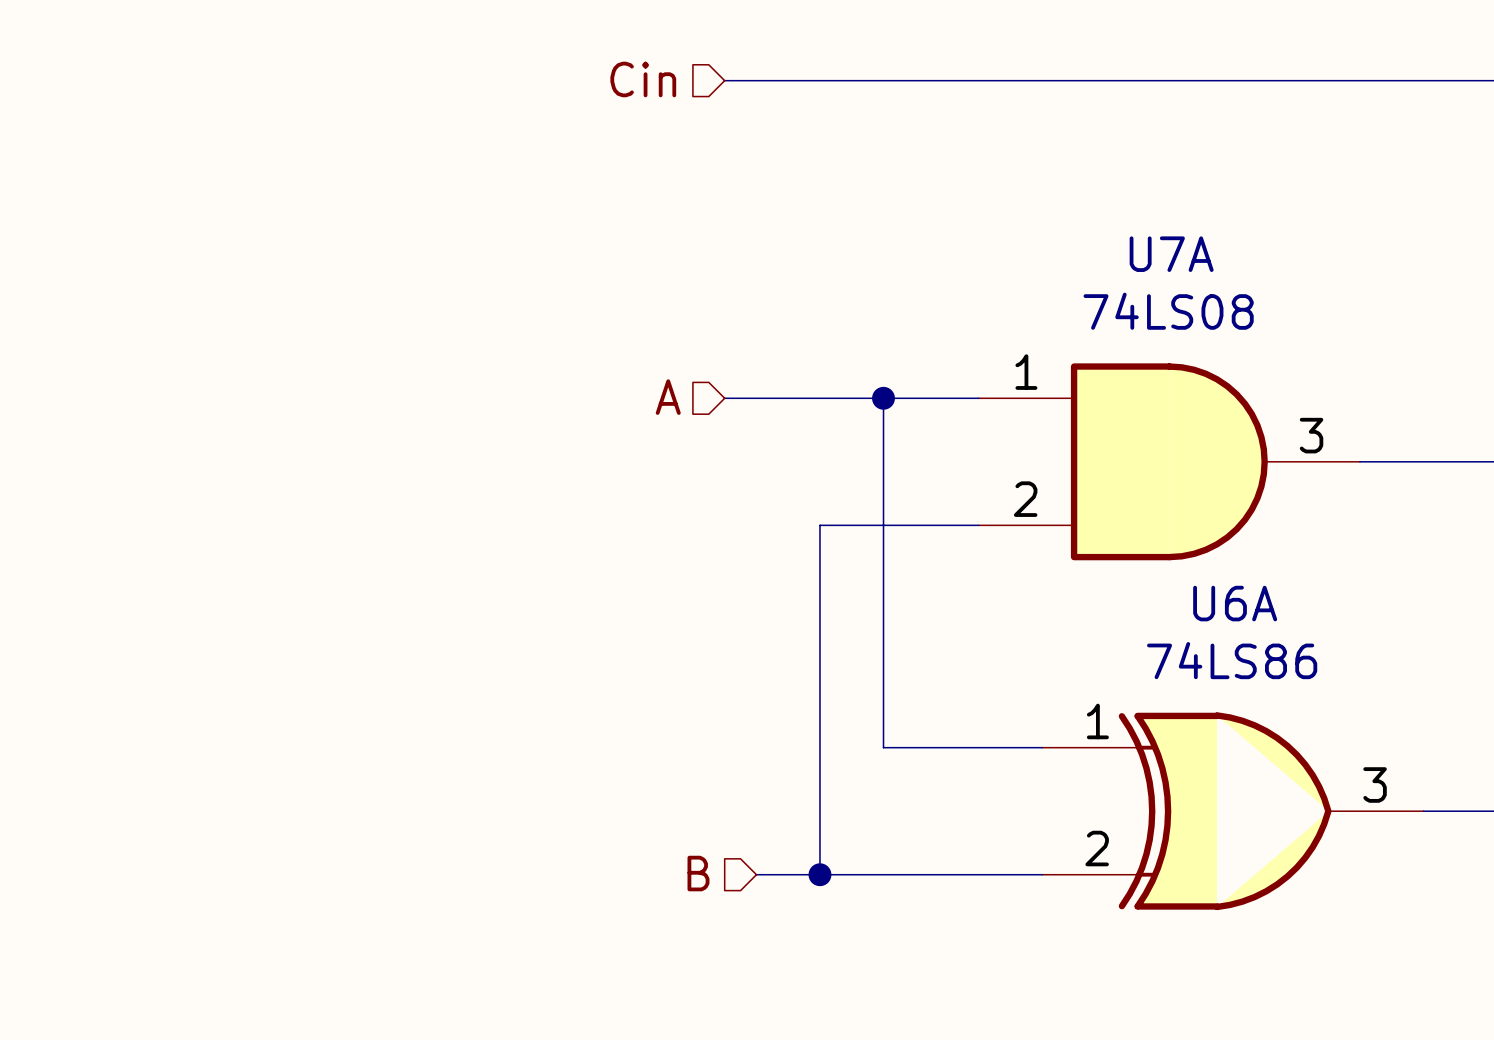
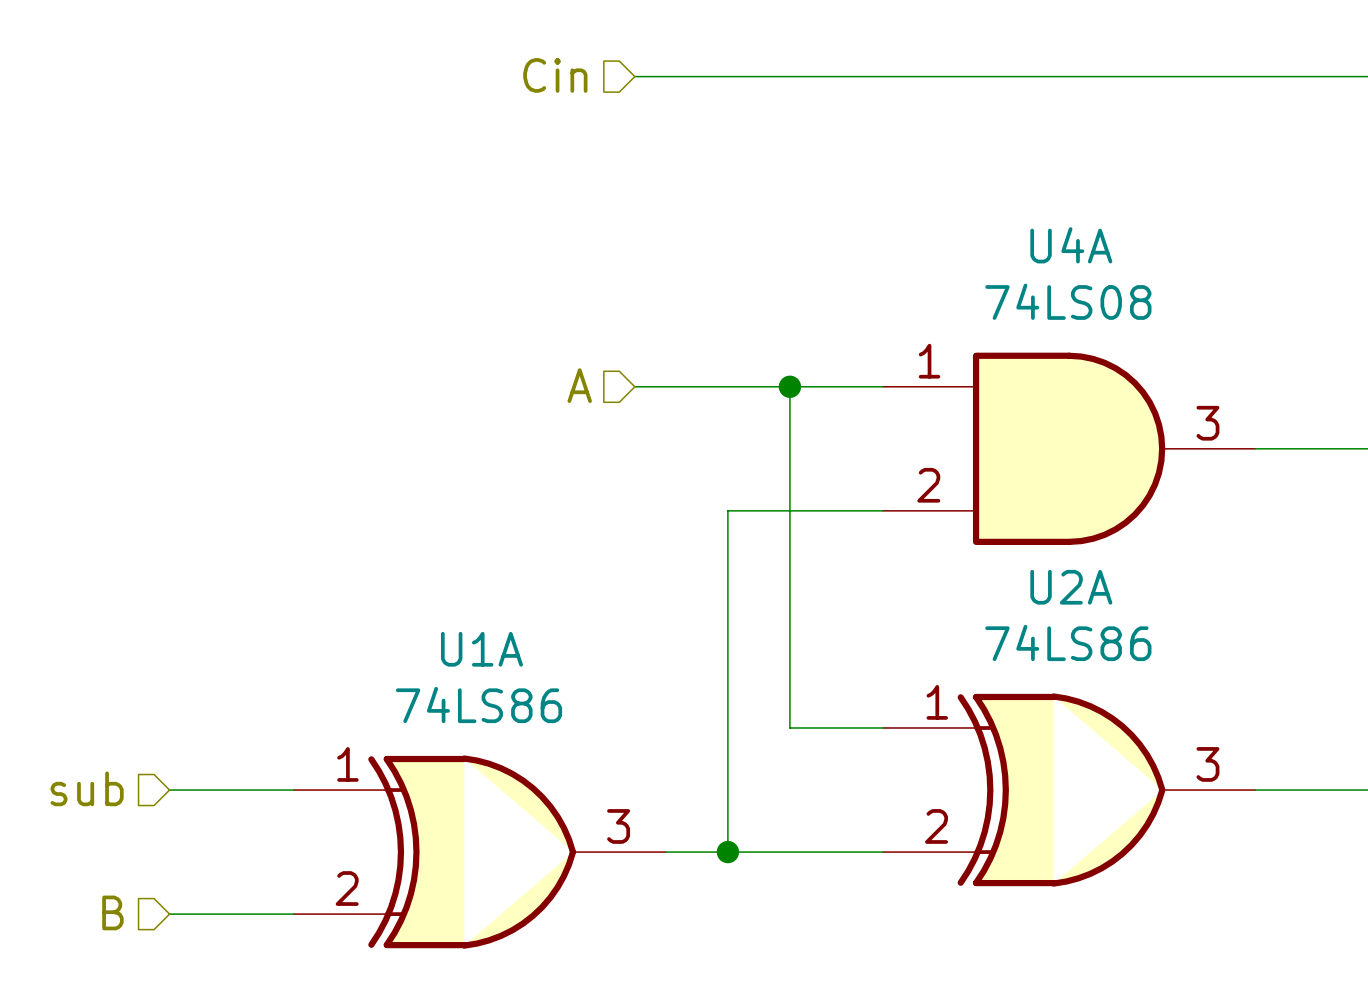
U7A name: U7A (1171, 254) -> U4A (1071, 245)
hierarchical label: none -> sub (87, 788)
wire: none -> (169, 790) (293, 790)
U2A: none -> 74LS86 (1069, 790)
U6A: 74LS86 (1232, 811) -> none
hierarchical label position: B (698, 873) -> B (112, 912)
U1A: none -> 74LS86 (479, 852)
wire: none -> (169, 914) (293, 914)

